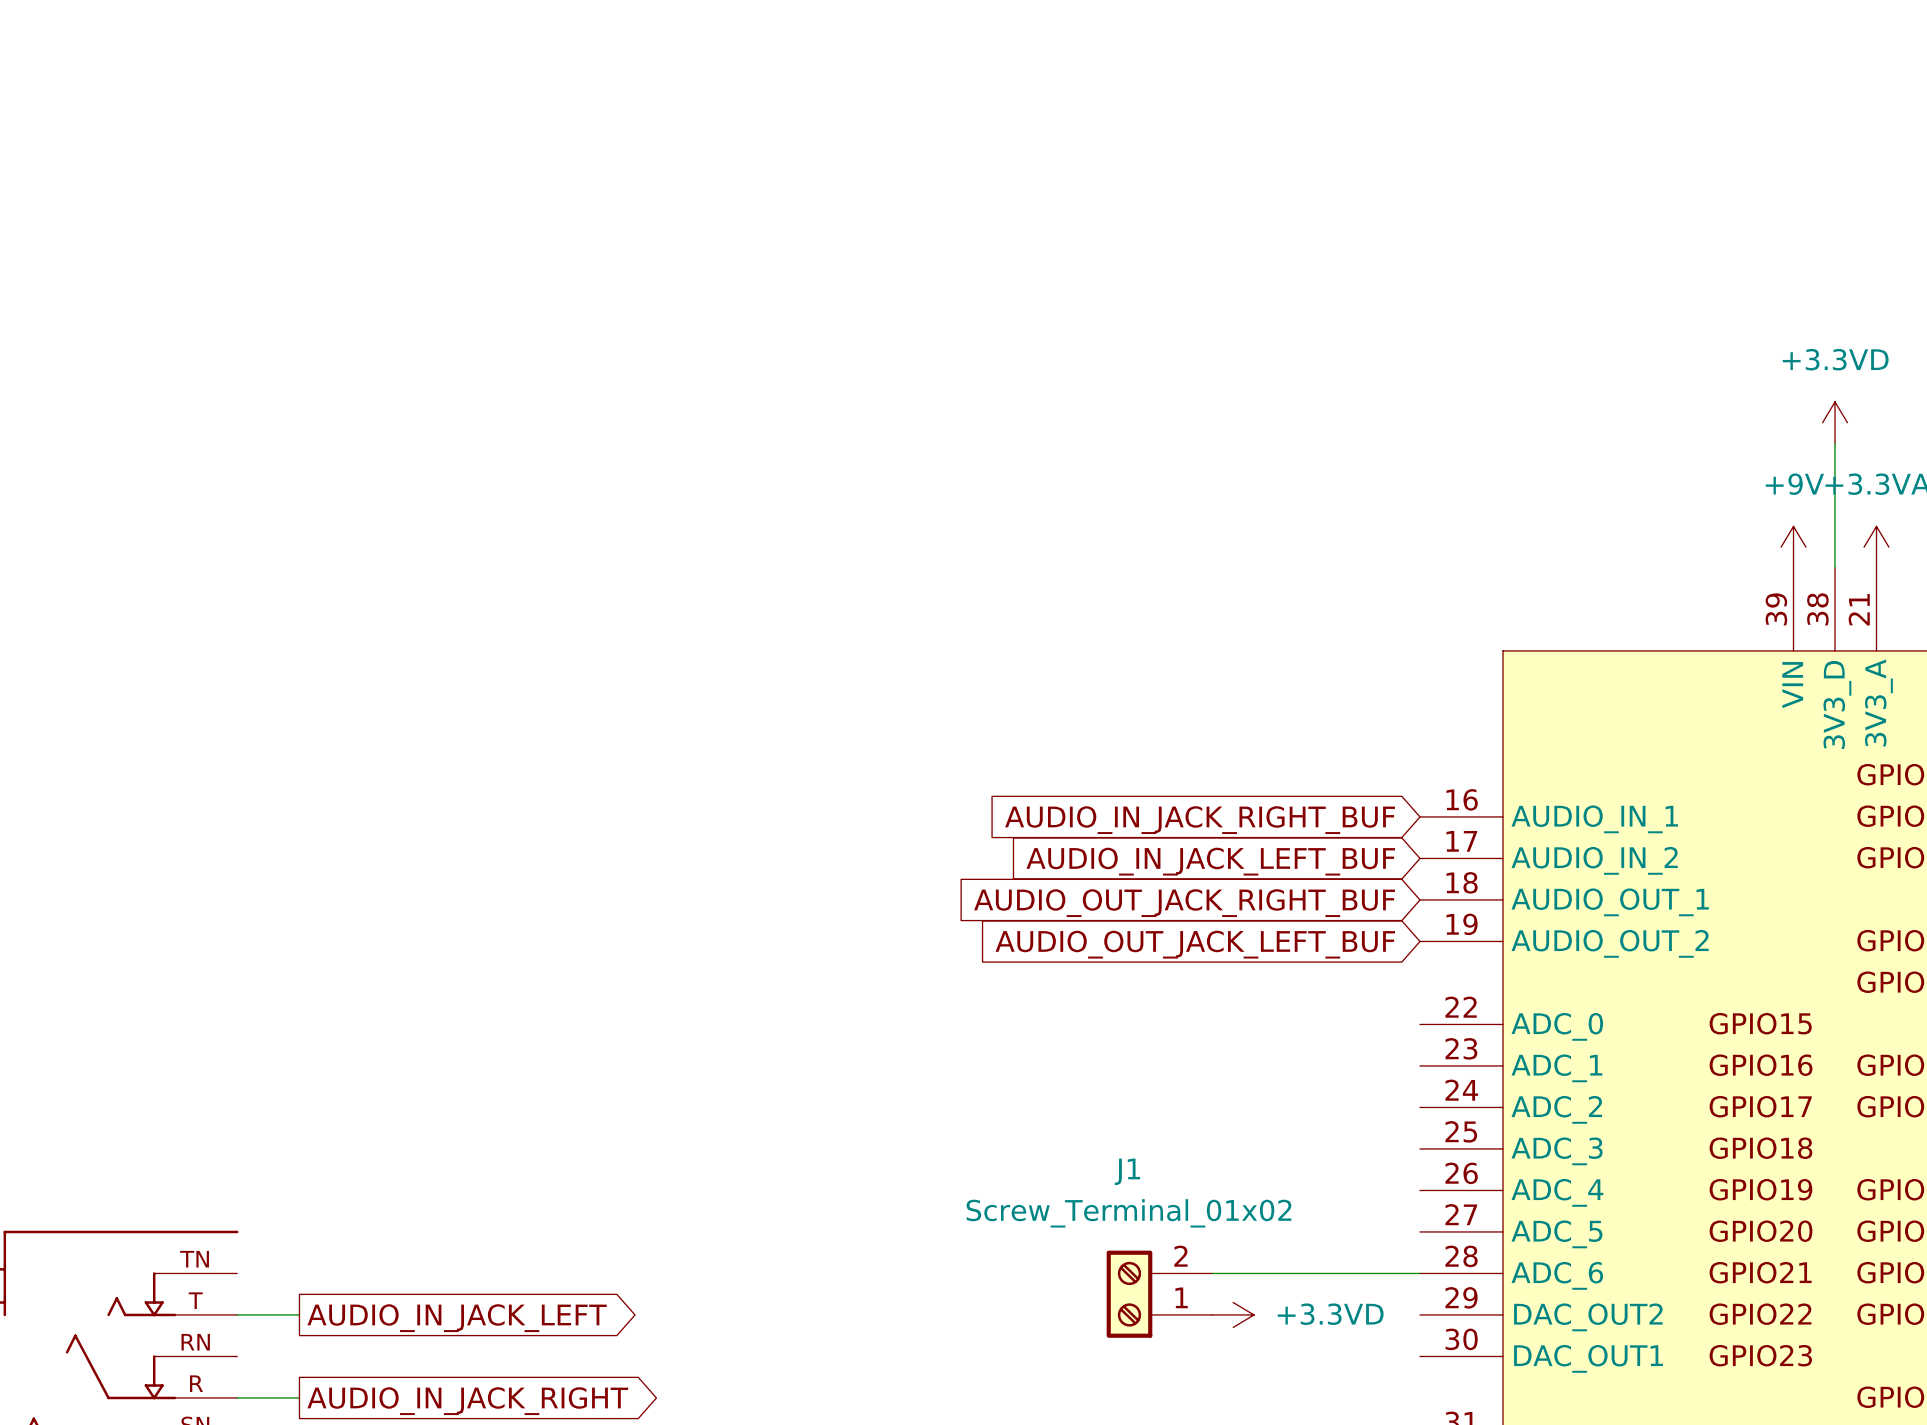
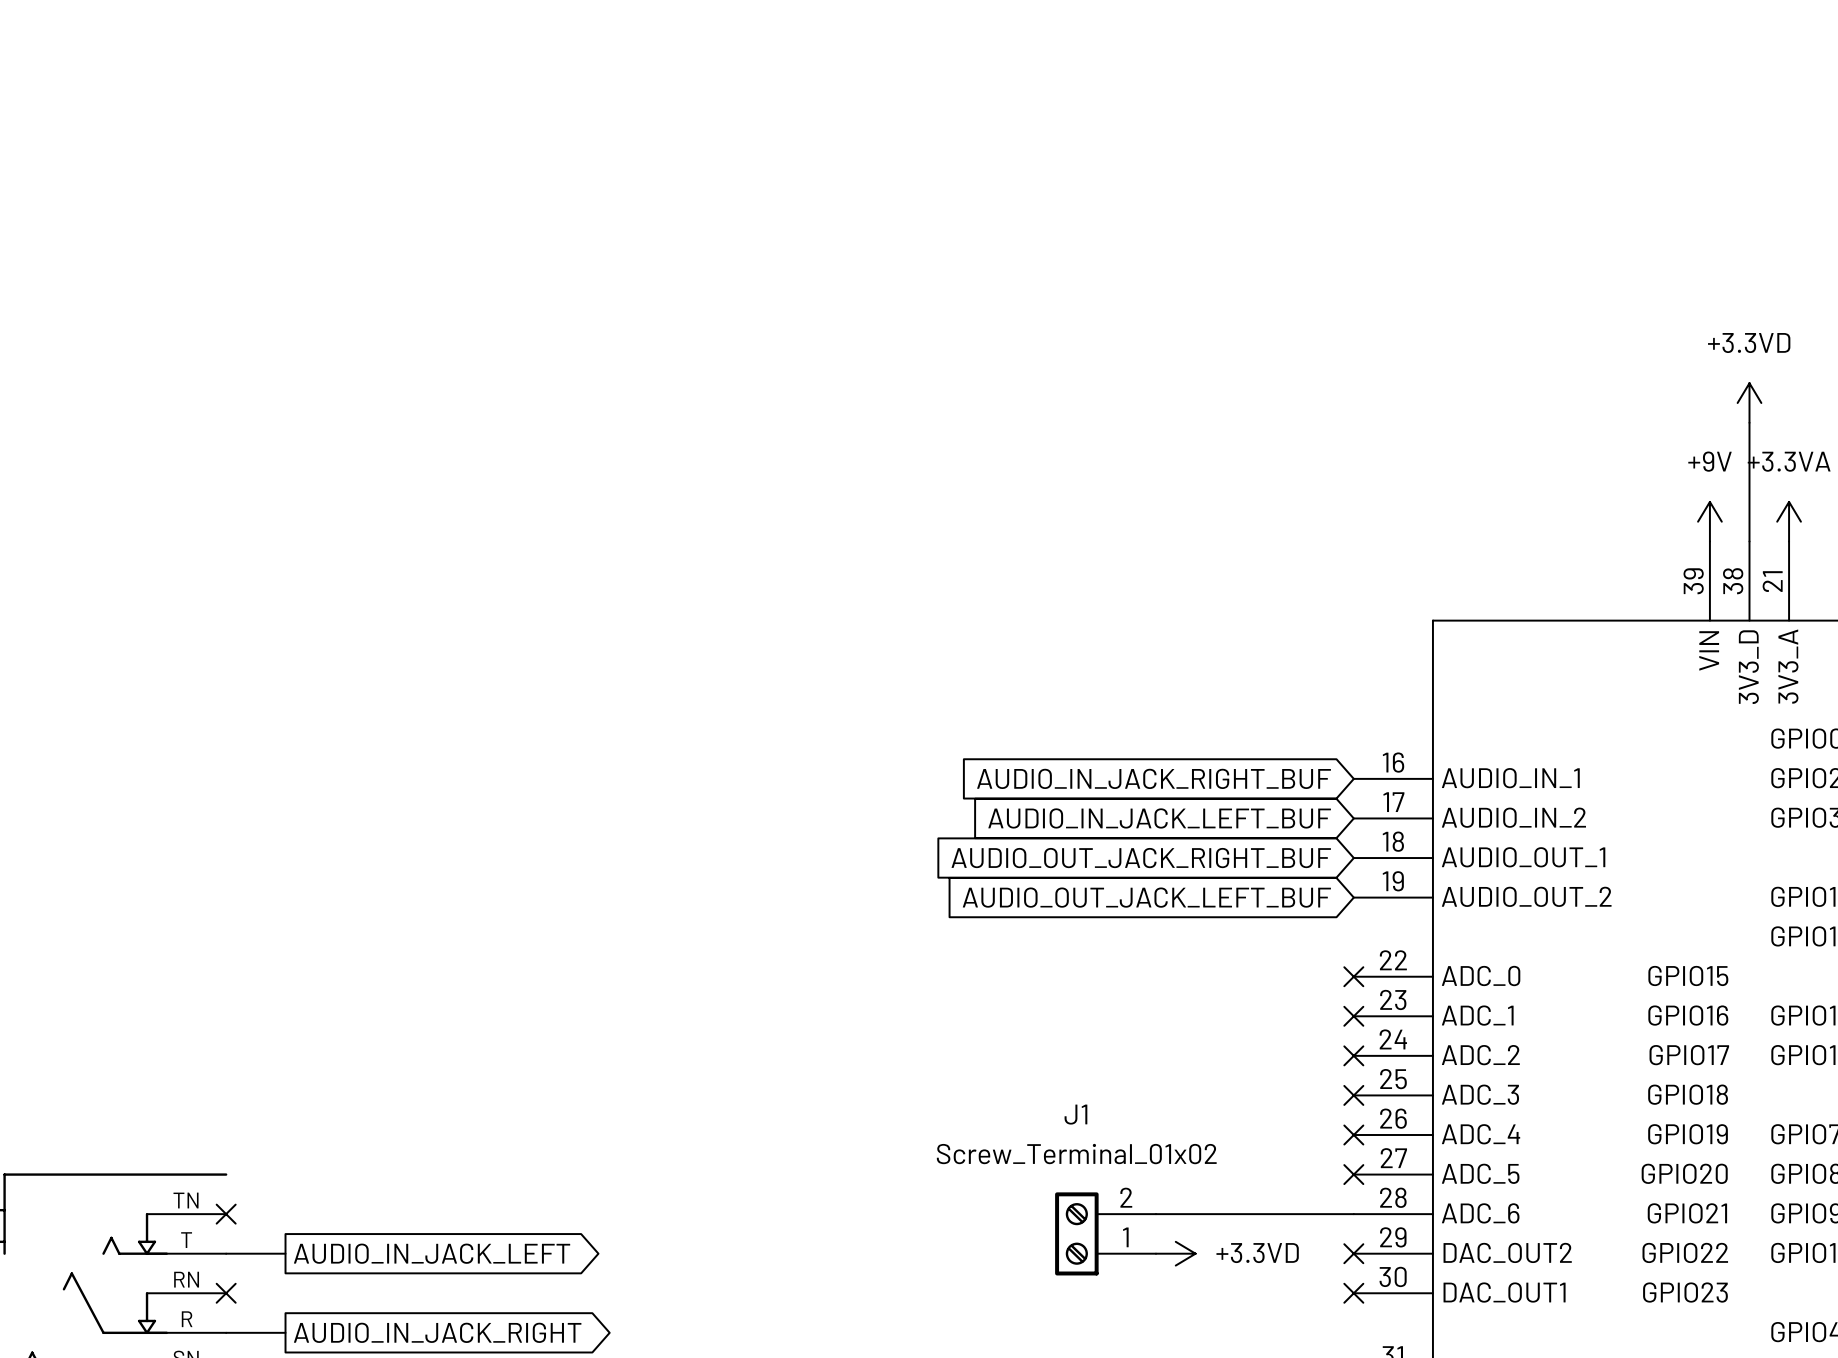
no-connect mark: none -> (1353, 976)
no-connect mark: none -> (1353, 1016)
no-connect mark: none -> (1353, 1055)
no-connect mark: none -> (1353, 1095)
no-connect mark: none -> (1353, 1135)
no-connect mark: none -> (1353, 1174)
no-connect mark: none -> (226, 1214)
no-connect mark: none -> (1353, 1253)
no-connect mark: none -> (226, 1293)
no-connect mark: none -> (1353, 1293)

